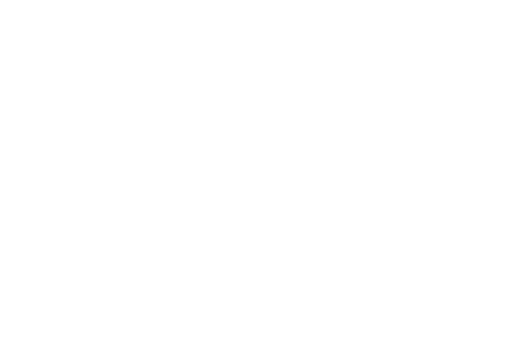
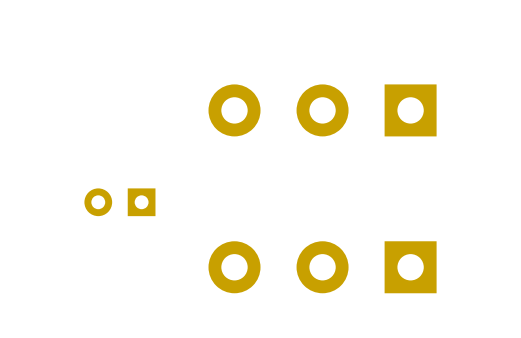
part: none -> (322, 110)
part: none -> (119, 202)
part: none -> (322, 267)

